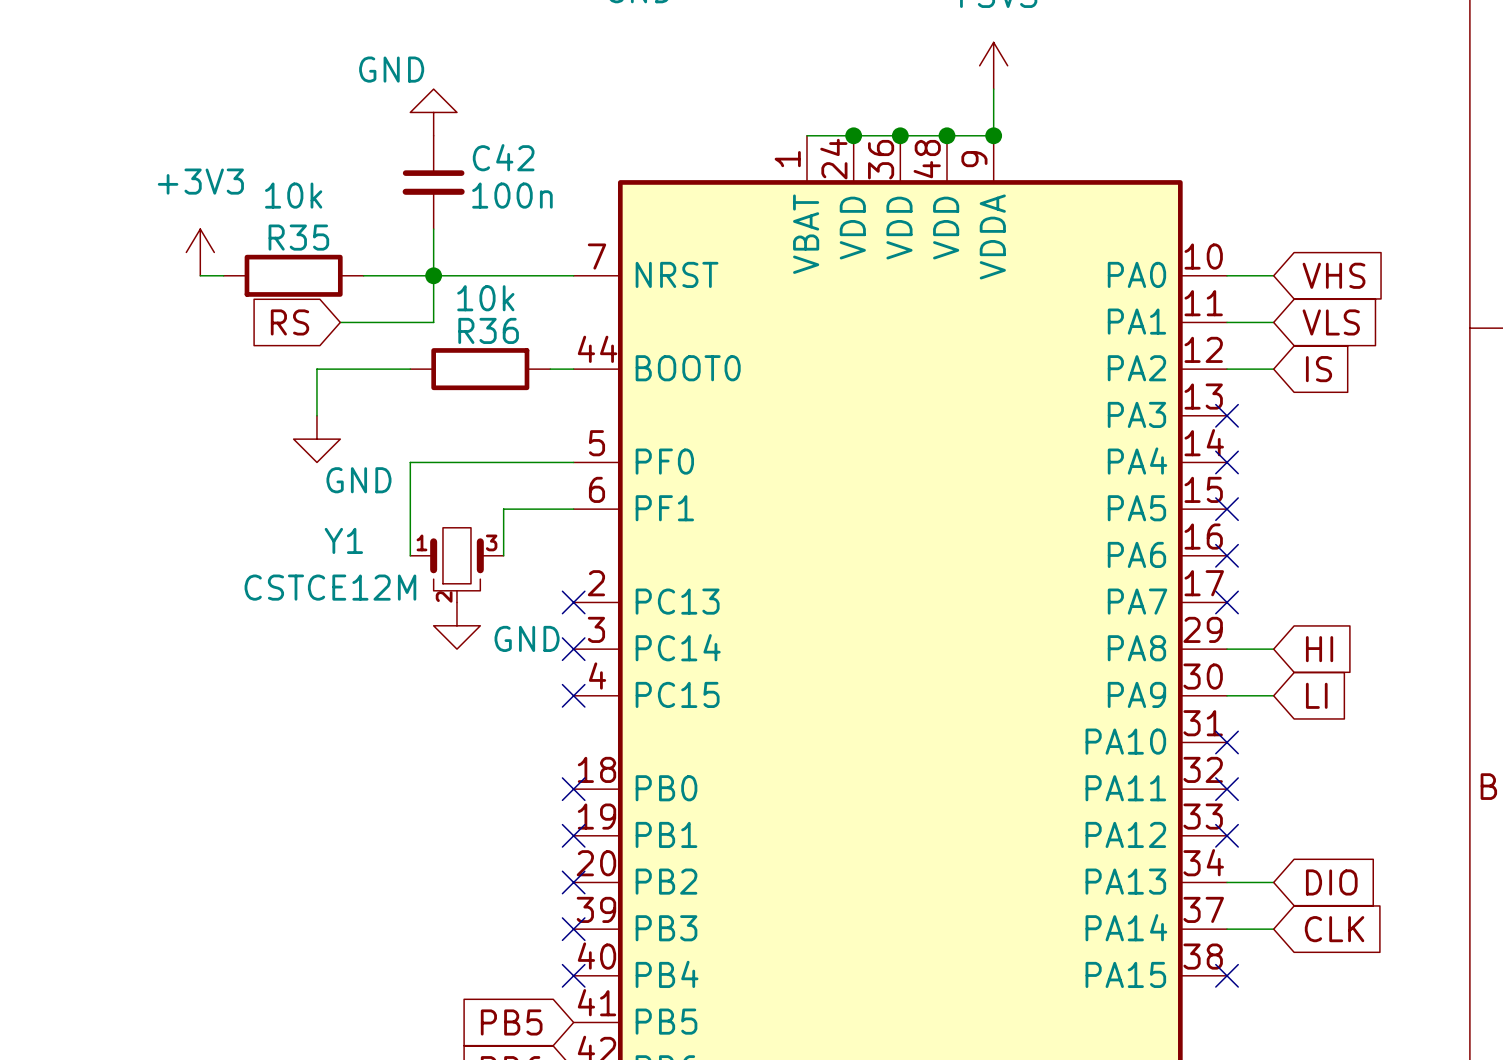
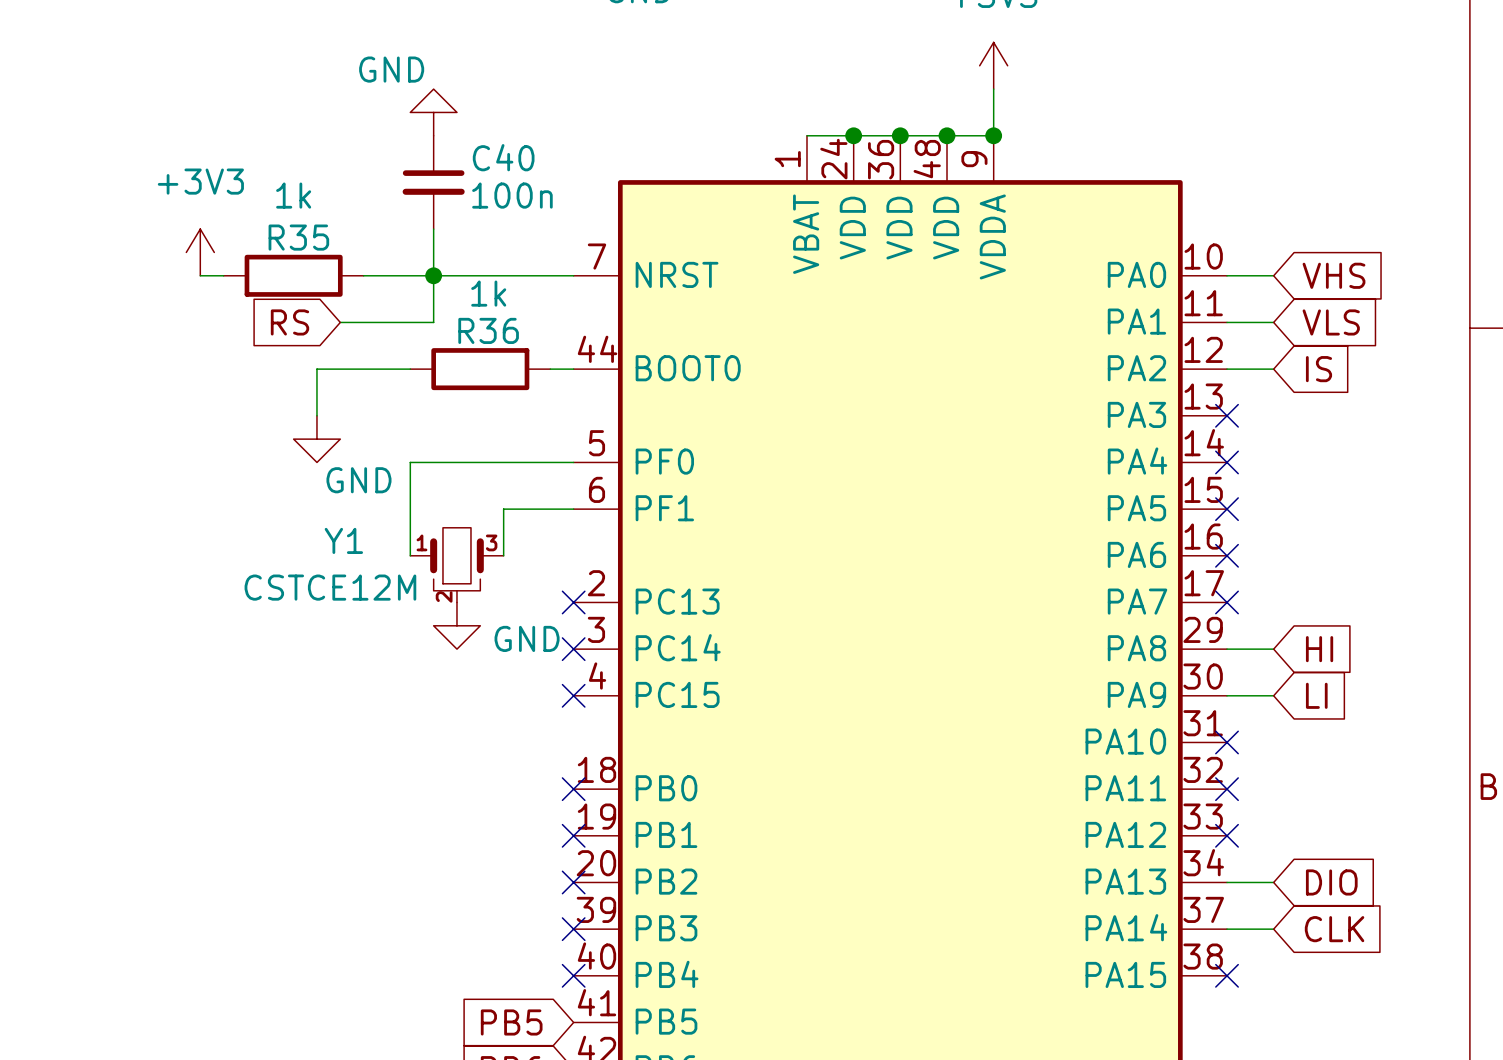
C42 name: C42 (503, 157) -> C40 (503, 157)
R35 value: 10k (293, 195) -> 1k (293, 195)
R36 value: 10k (485, 298) -> 1k (488, 293)

